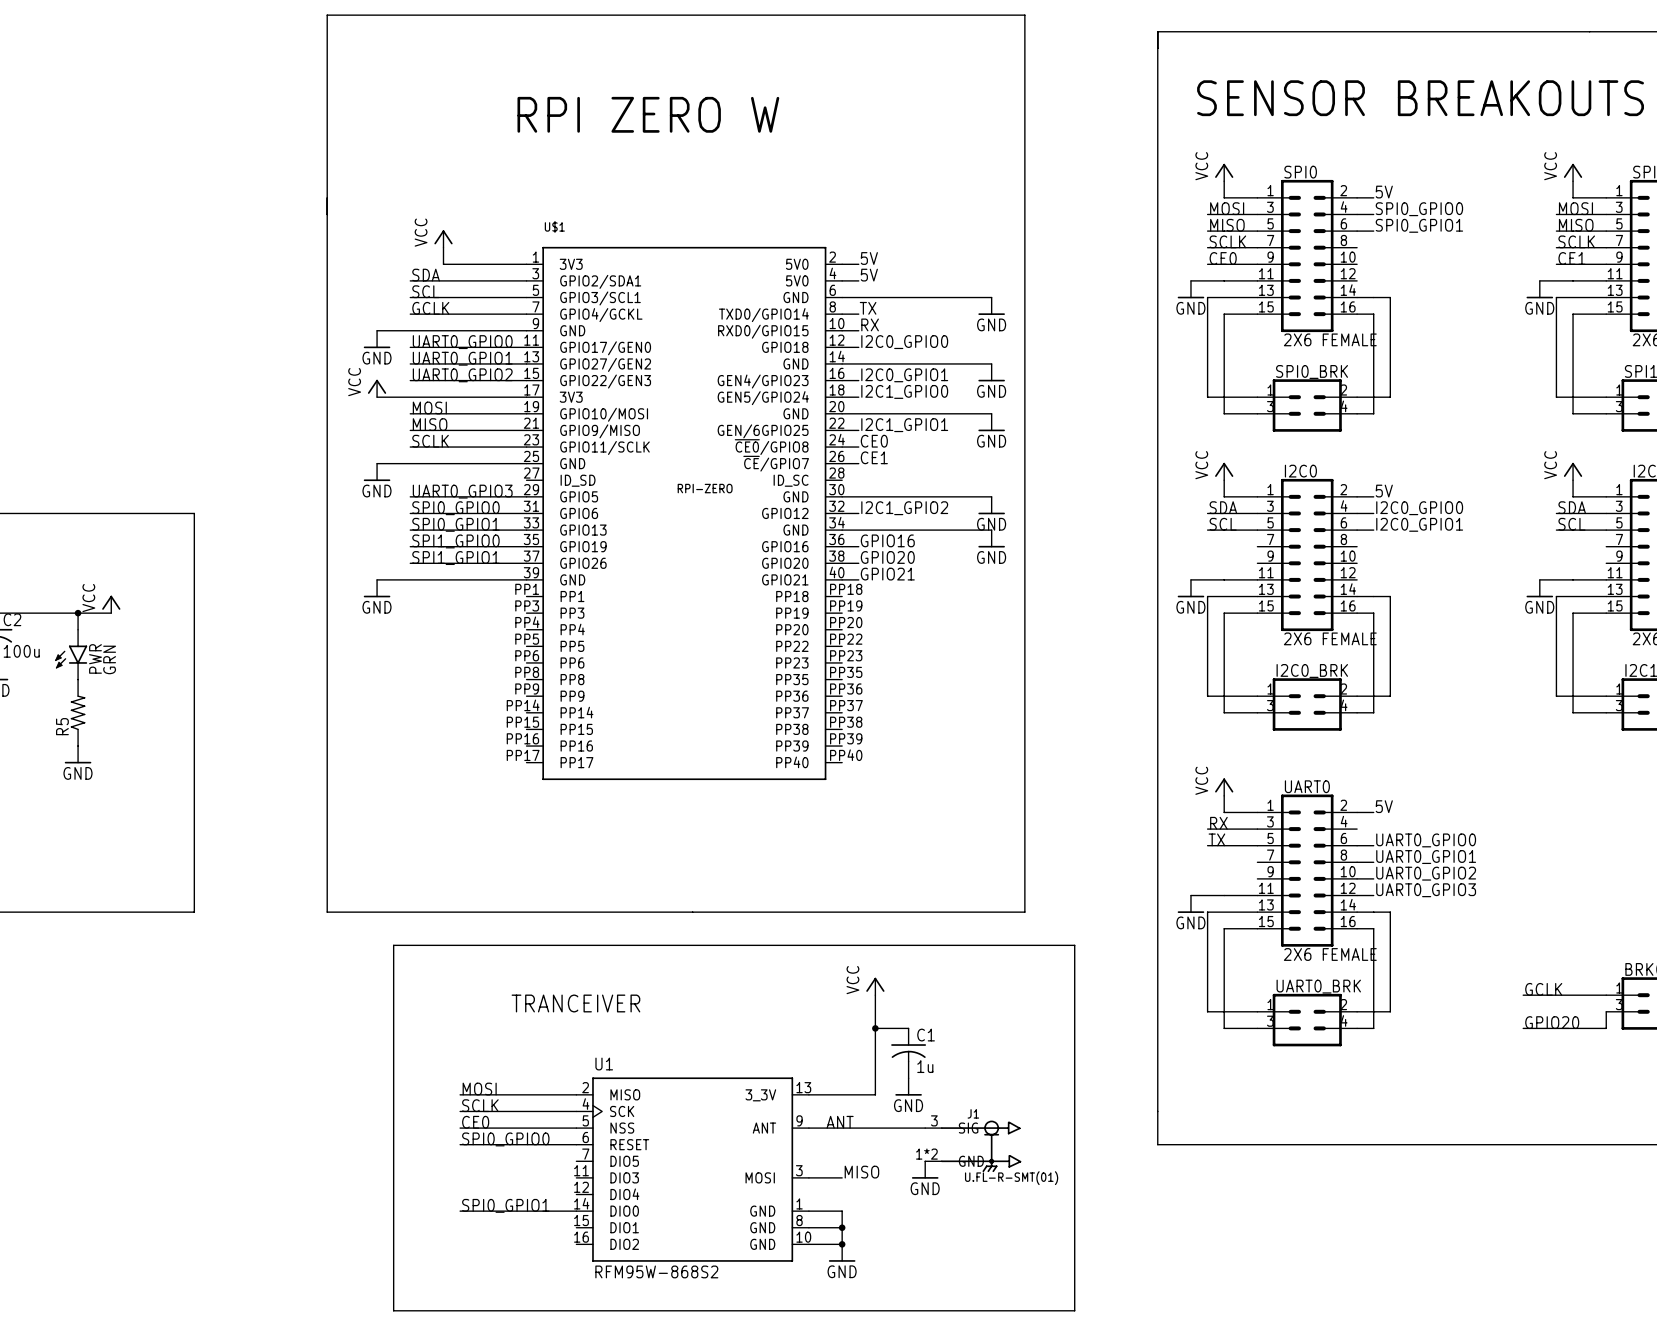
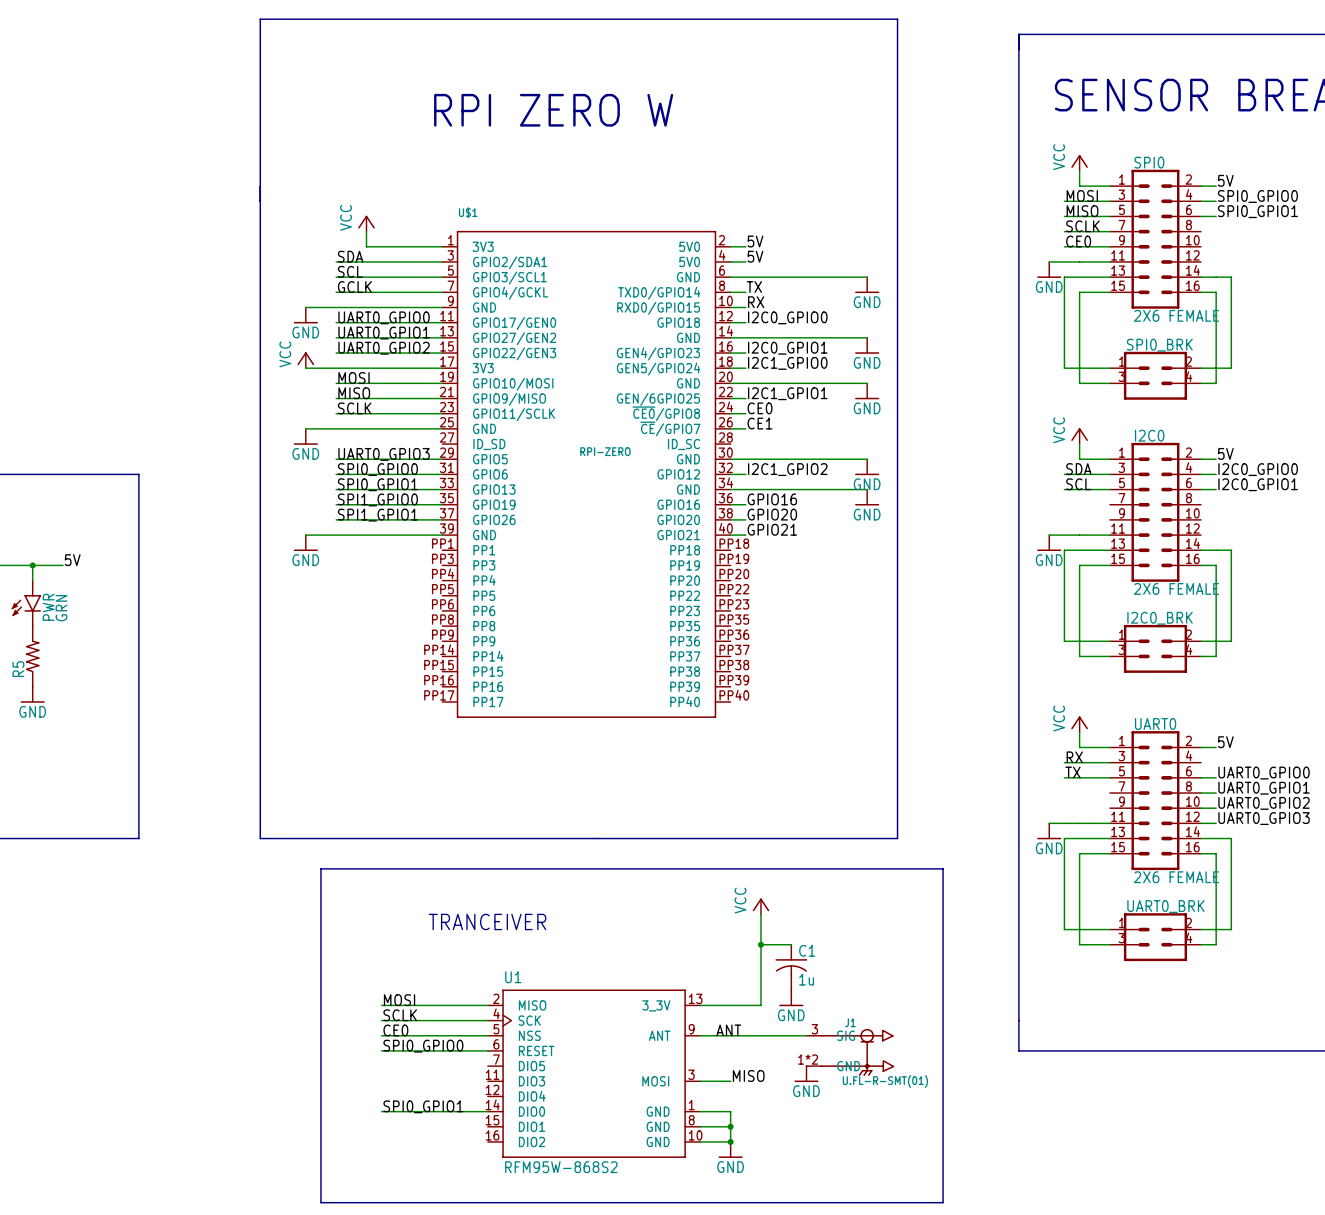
power symbol: VCC (111, 604) -> none
label: none -> 5V (72, 560)

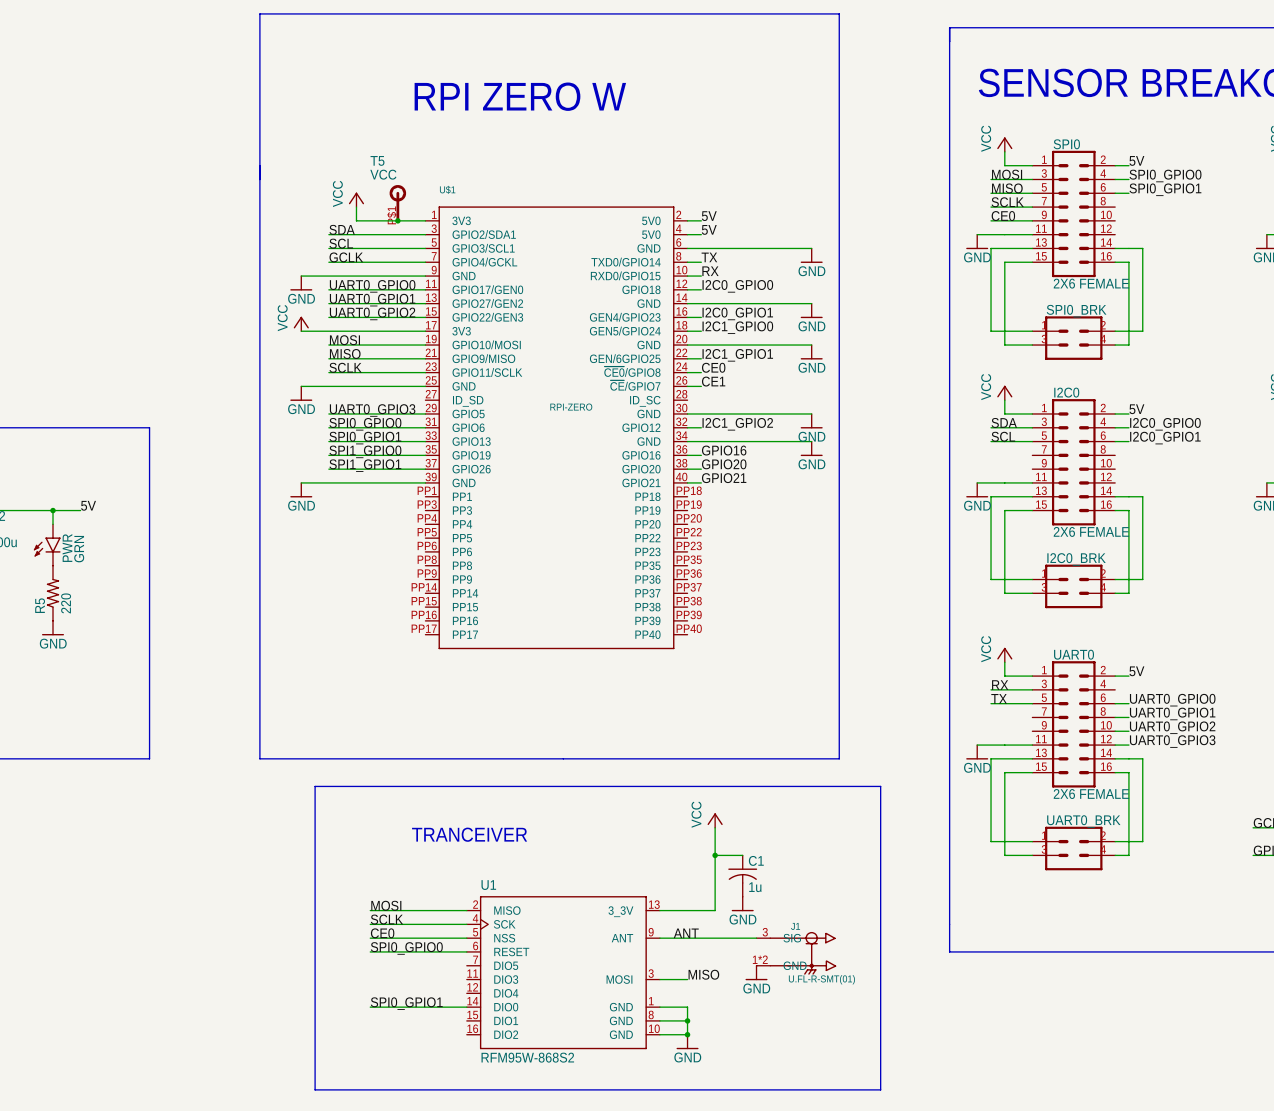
T5: none -> VCC (397, 203)
junction: none -> (397, 220)
R5 value: none -> 220 (66, 603)

